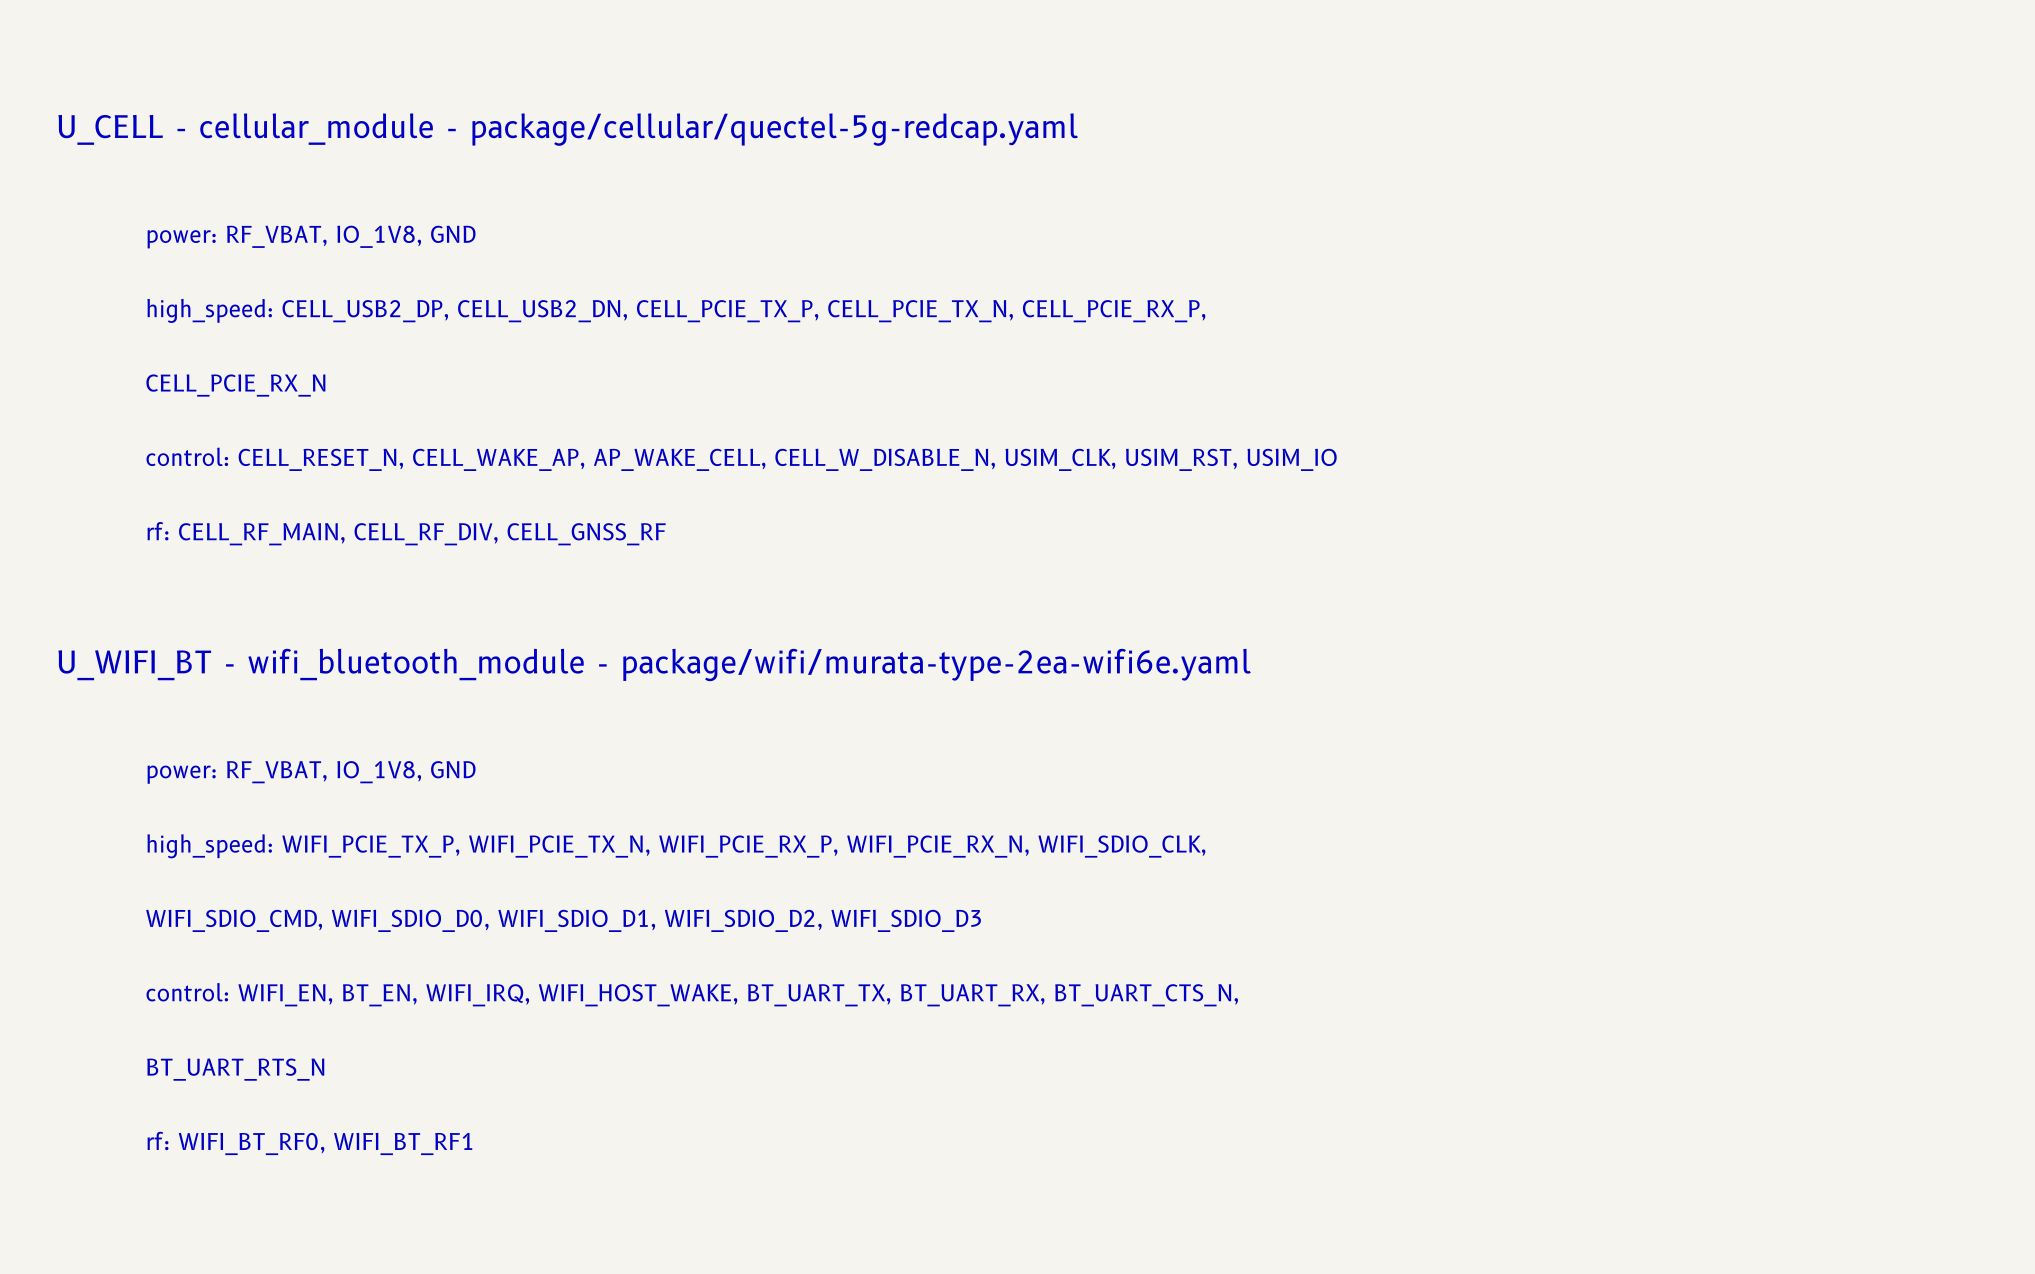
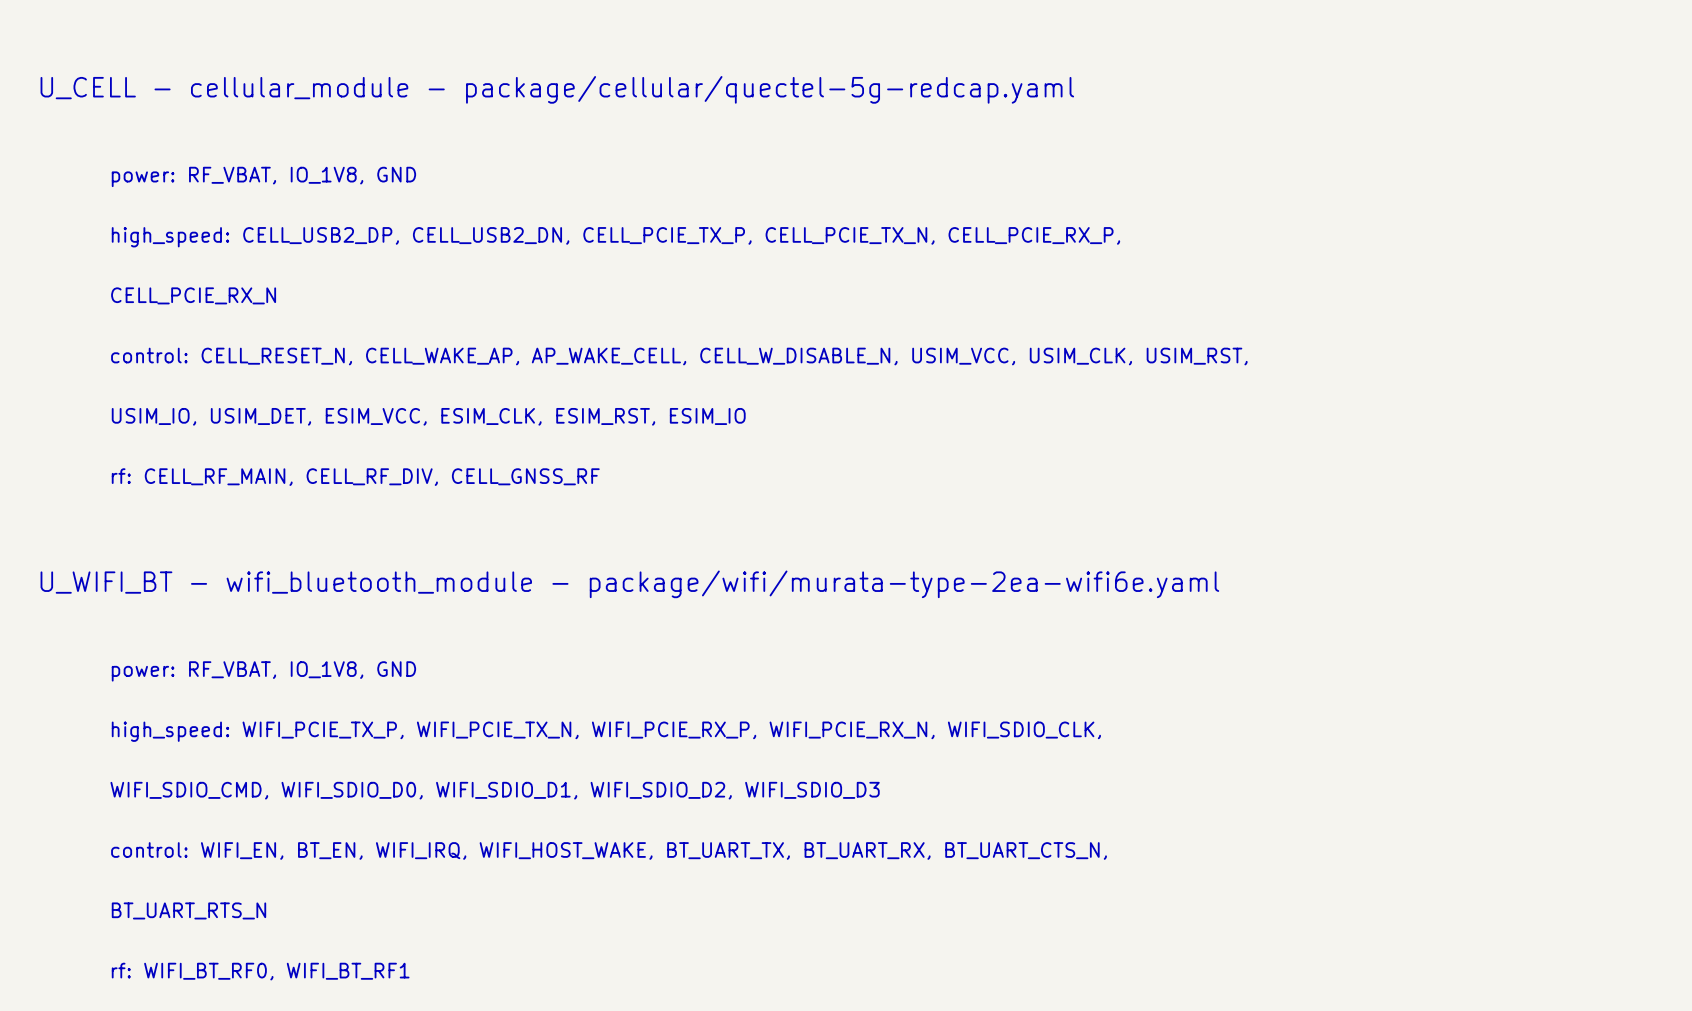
text: control: CELL_RESET_N, CELL_WAKE_AP, AP_WAKE_CELL, CELL_W_DISABLE_N, USIM_CLK, USIM_RST, USIM_IO (741, 459) -> control: CELL_RESET_N, CELL_WAKE_AP, AP_WAKE_CELL, CELL_W_DISABLE_N, USIM_VCC, USIM_CLK, USIM_RST, (679, 356)
text: rf: CELL_RF_MAIN, CELL_RF_DIV, CELL_GNSS_RF (406, 533) -> USIM_IO, USIM_DET, ESIM_VCC, ESIM_CLK, ESIM_RST, ESIM_IO (428, 416)
text: none -> rf: CELL_RF_MAIN, CELL_RF_DIV, CELL_GNSS_RF (355, 477)
text position: U_WIFI_BT - wifi_bluetooth_module - package/wifi/murata-type-2ea-wifi6e.yaml (654, 664) -> U_WIFI_BT - wifi_bluetooth_module - package/wifi/murata-type-2ea-wifi6e.yaml (629, 584)
text: power: RF_VBAT, IO_1V8, GND (311, 772) -> none
text: high_speed: WIFI_PCIE_TX_P, WIFI_PCIE_TX_N, WIFI_PCIE_RX_P, WIFI_PCIE_RX_N, WIFI_SDIO_CLK, (676, 846) -> power: RF_VBAT, IO_1V8, GND (263, 671)
text: WIFI_SDIO_CMD, WIFI_SDIO_D0, WIFI_SDIO_D1, WIFI_SDIO_D2, WIFI_SDIO_D3 (563, 920) -> high_speed: WIFI_PCIE_TX_P, WIFI_PCIE_TX_N, WIFI_PCIE_RX_P, WIFI_PCIE_RX_N, WIFI_SDIO_CLK, (606, 731)
text: control: WIFI_EN, BT_EN, WIFI_IRQ, WIFI_HOST_WAKE, BT_UART_TX, BT_UART_RX, BT_UART_CTS_N, (692, 994) -> WIFI_SDIO_CMD, WIFI_SDIO_D0, WIFI_SDIO_D1, WIFI_SDIO_D2, WIFI_SDIO_D3 (495, 790)
text: BT_UART_RTS_N (235, 1069) -> control: WIFI_EN, BT_EN, WIFI_IRQ, WIFI_HOST_WAKE, BT_UART_TX, BT_UART_RX, BT_UART_CTS_N, (609, 850)
text: rf: WIFI_BT_RF0, WIFI_BT_RF1 (309, 1143) -> BT_UART_RTS_N (188, 910)
text: none -> rf: WIFI_BT_RF0, WIFI_BT_RF1 (260, 971)

